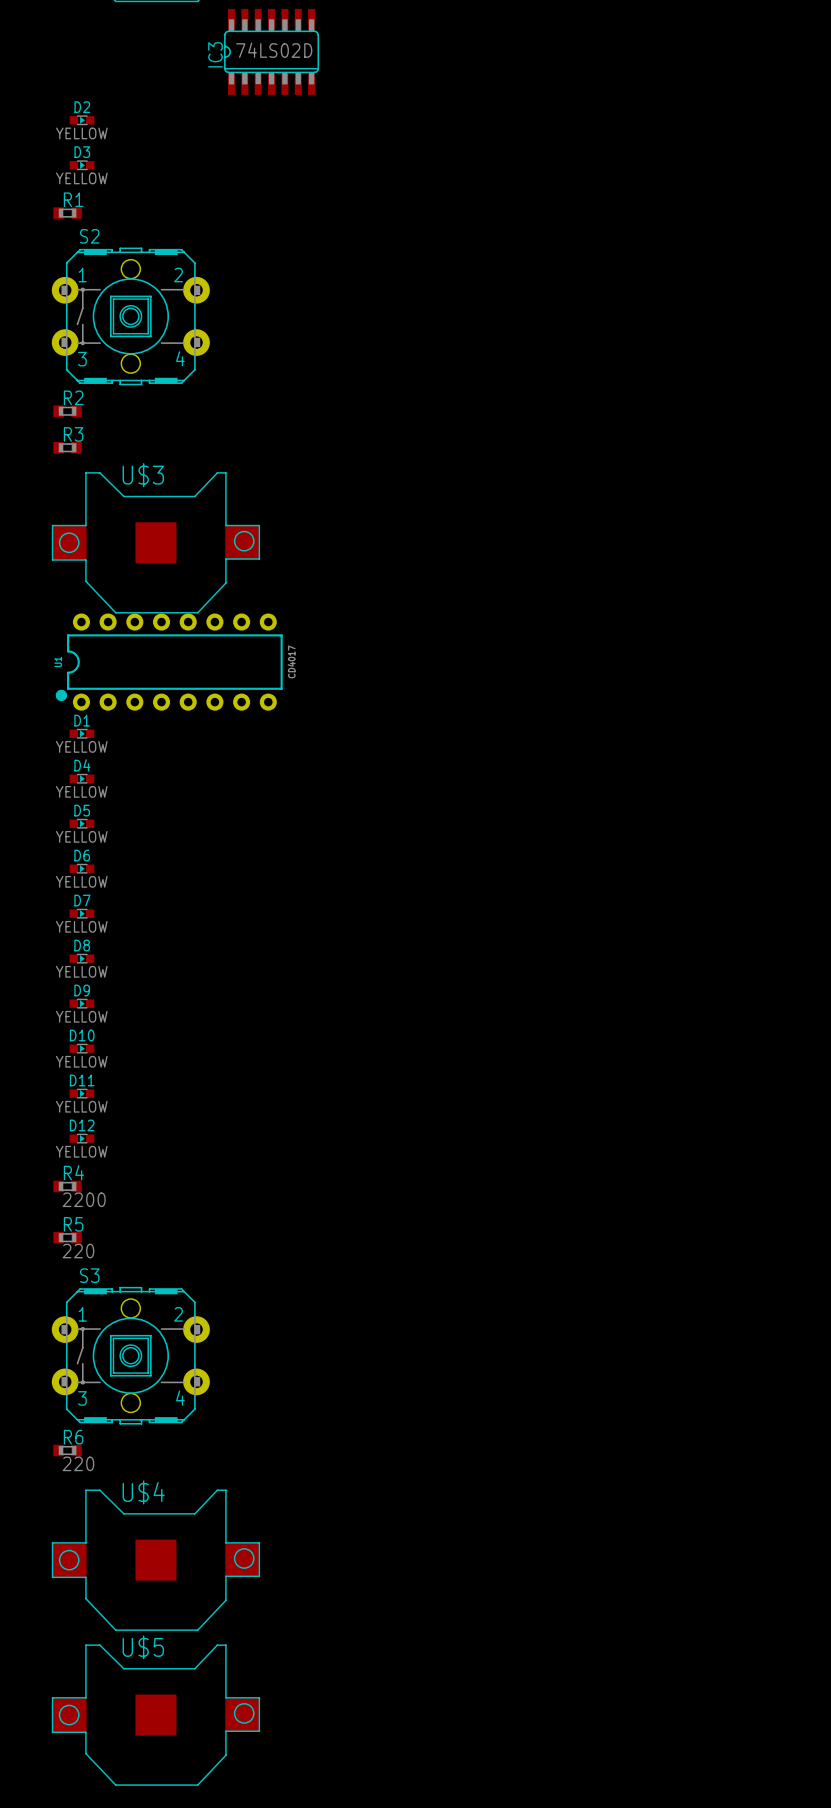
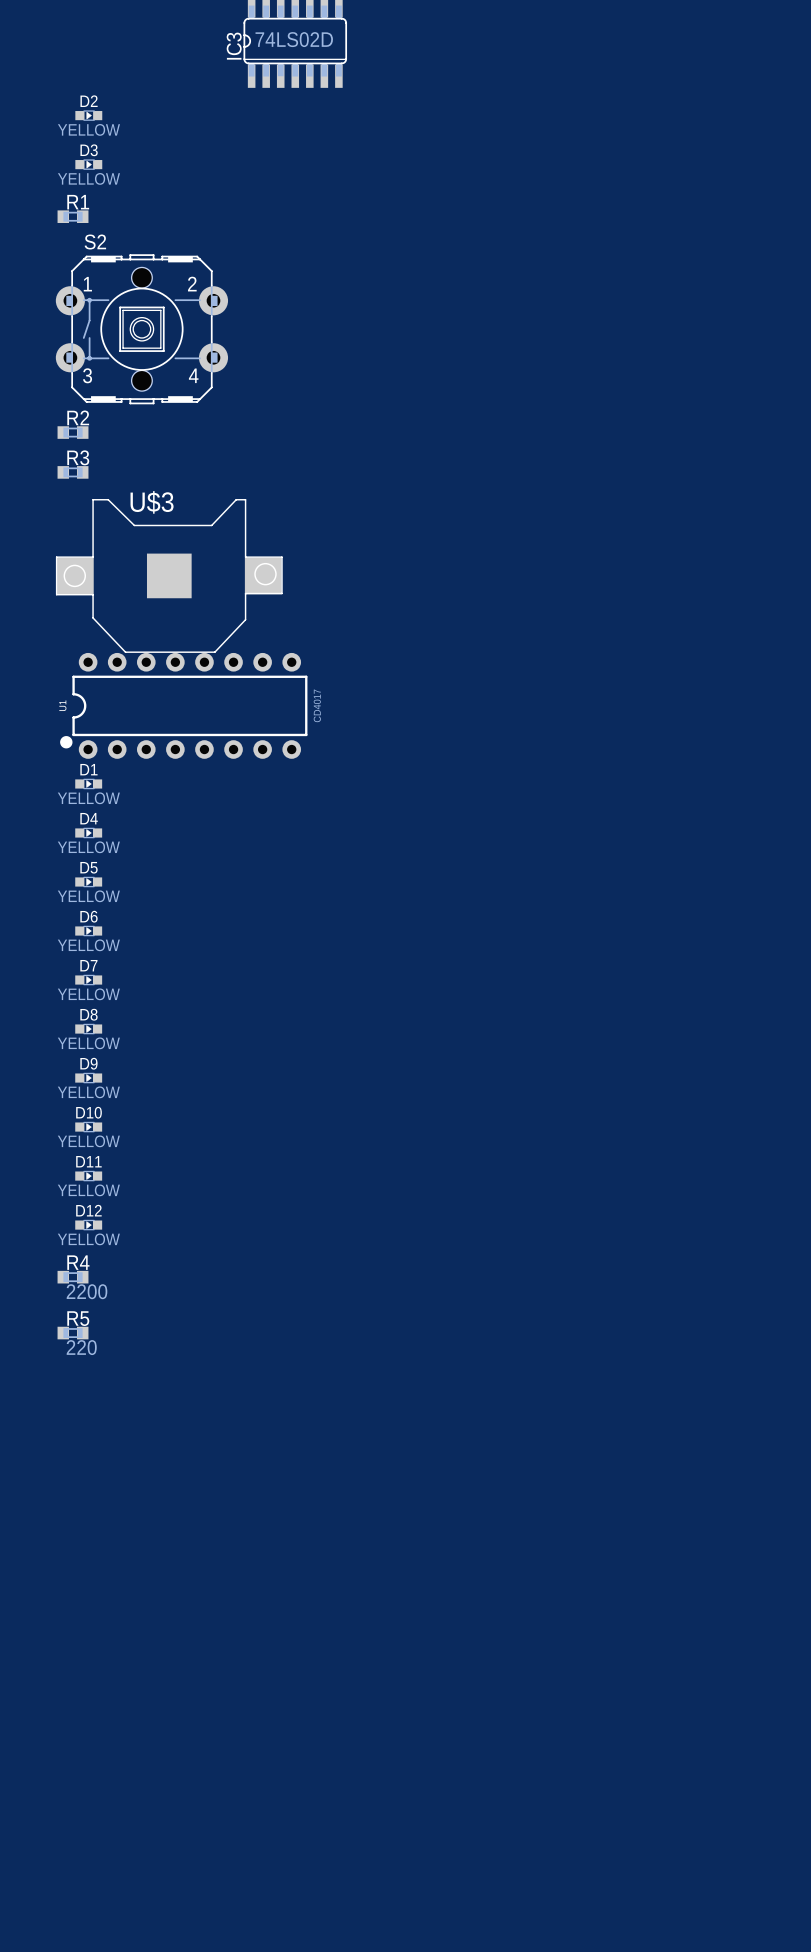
S3: (130, 1355) -> none
R6: 220 (67, 1450) -> none
U$4: (155, 1560) -> none
U$5: (155, 1715) -> none

